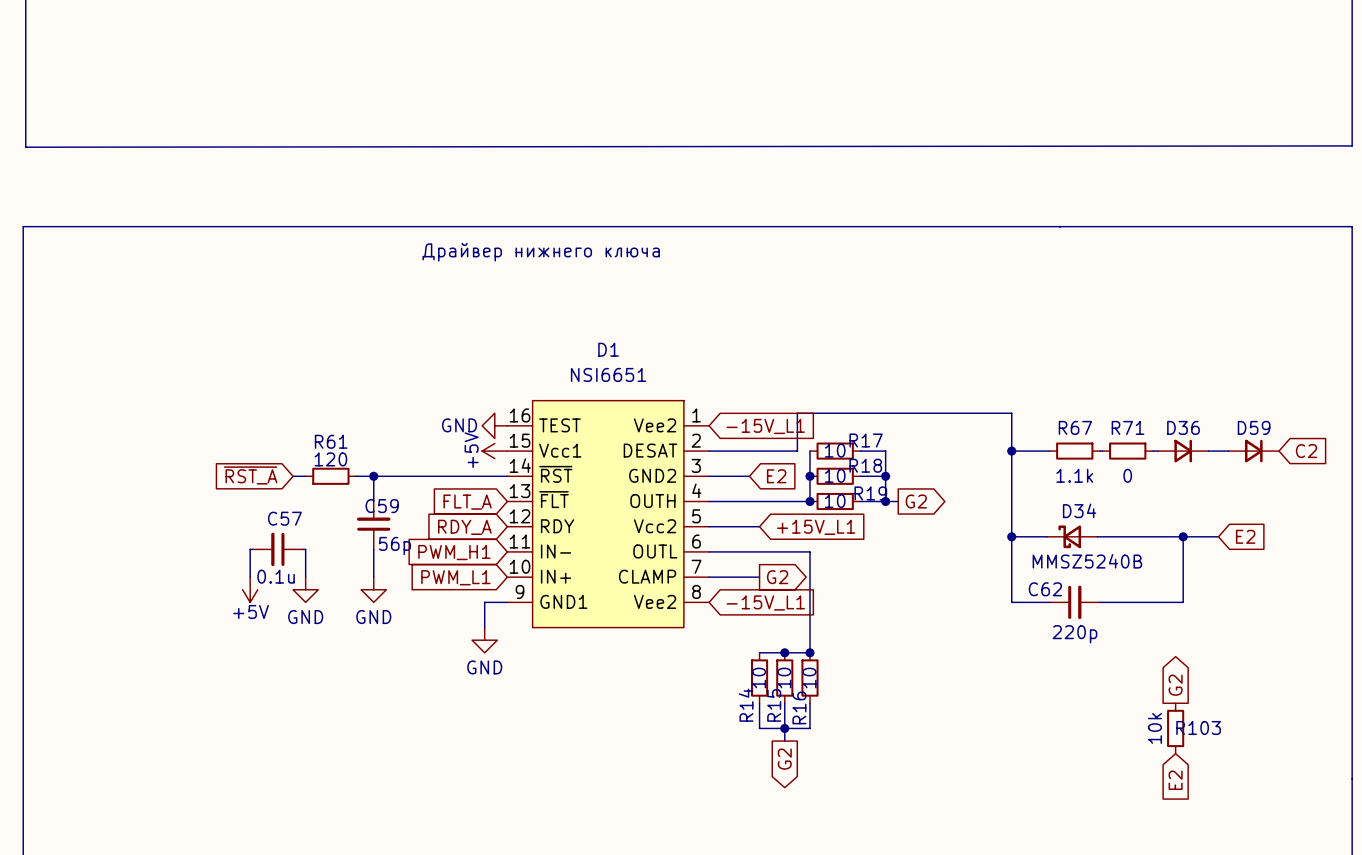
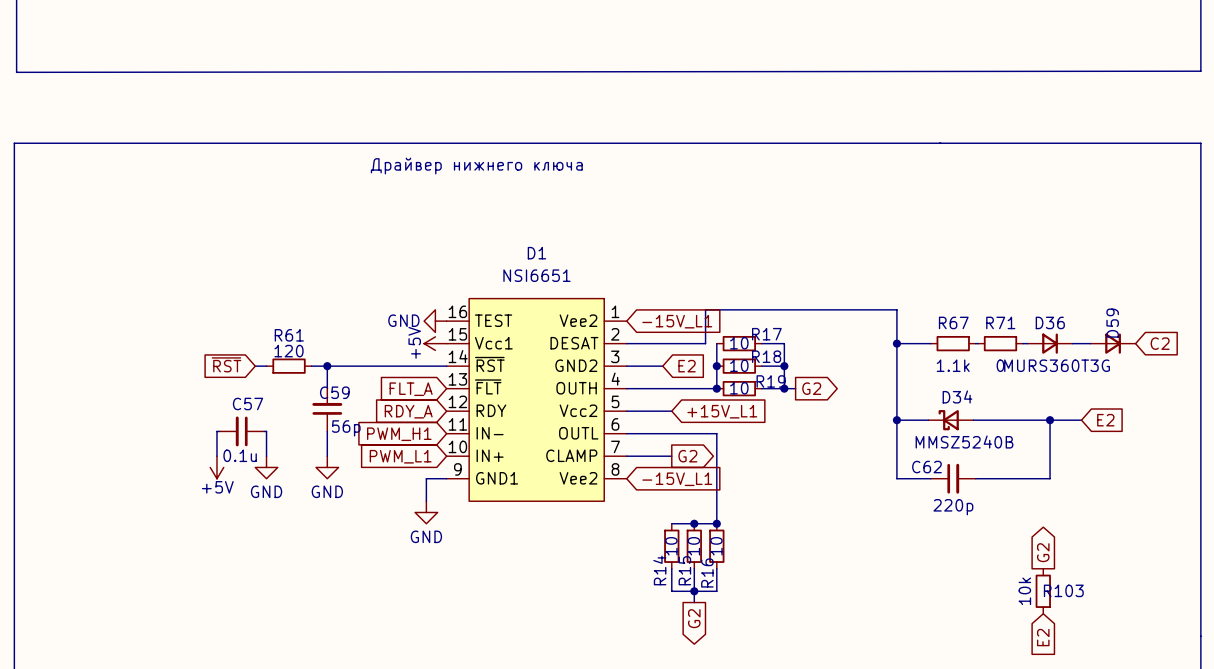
D59 name rotation: 0° (1254, 427) -> 90° counterclockwise (1112, 323)
global label: ~{RST_A} (250, 475) -> ~{RST} (226, 364)
D36 value: none -> MURS360T3G (1057, 365)

